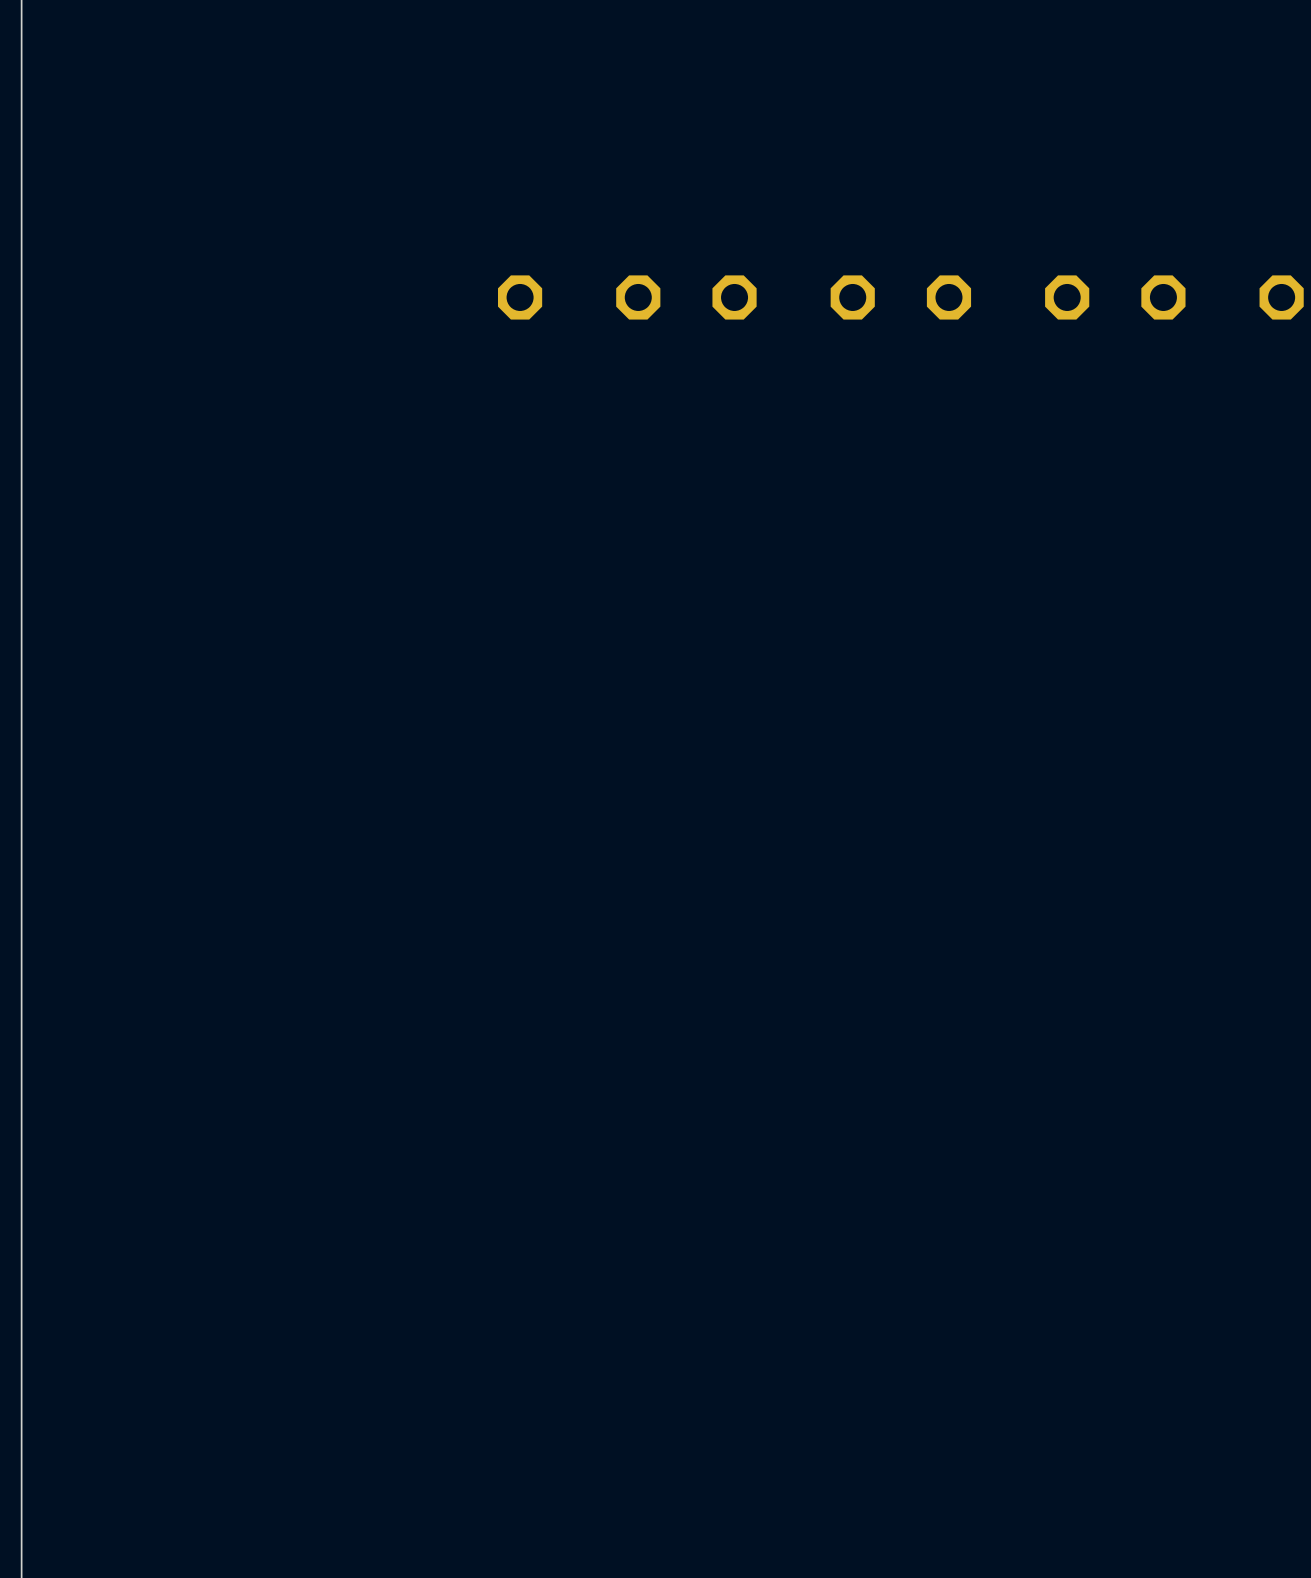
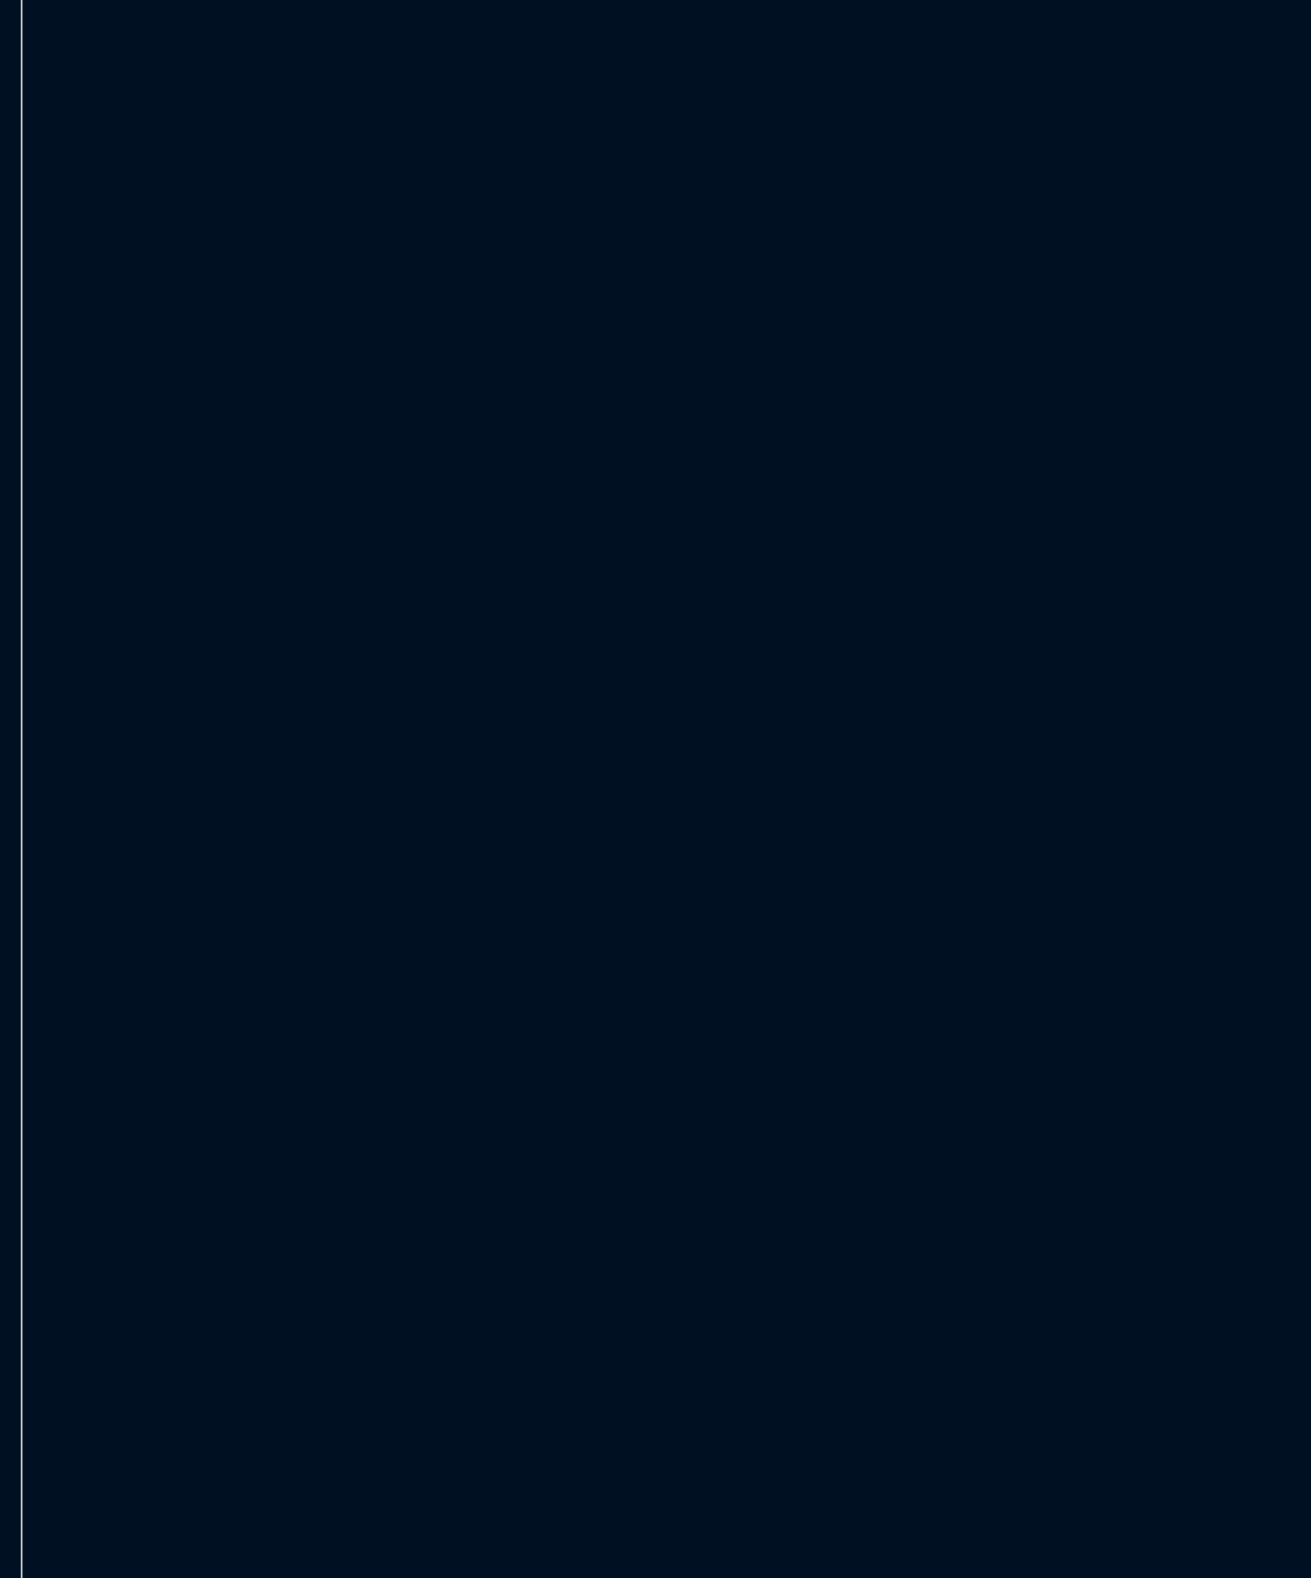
part: (579, 297) -> none
part: (793, 297) -> none
part: (1008, 297) -> none
part: (1222, 297) -> none

